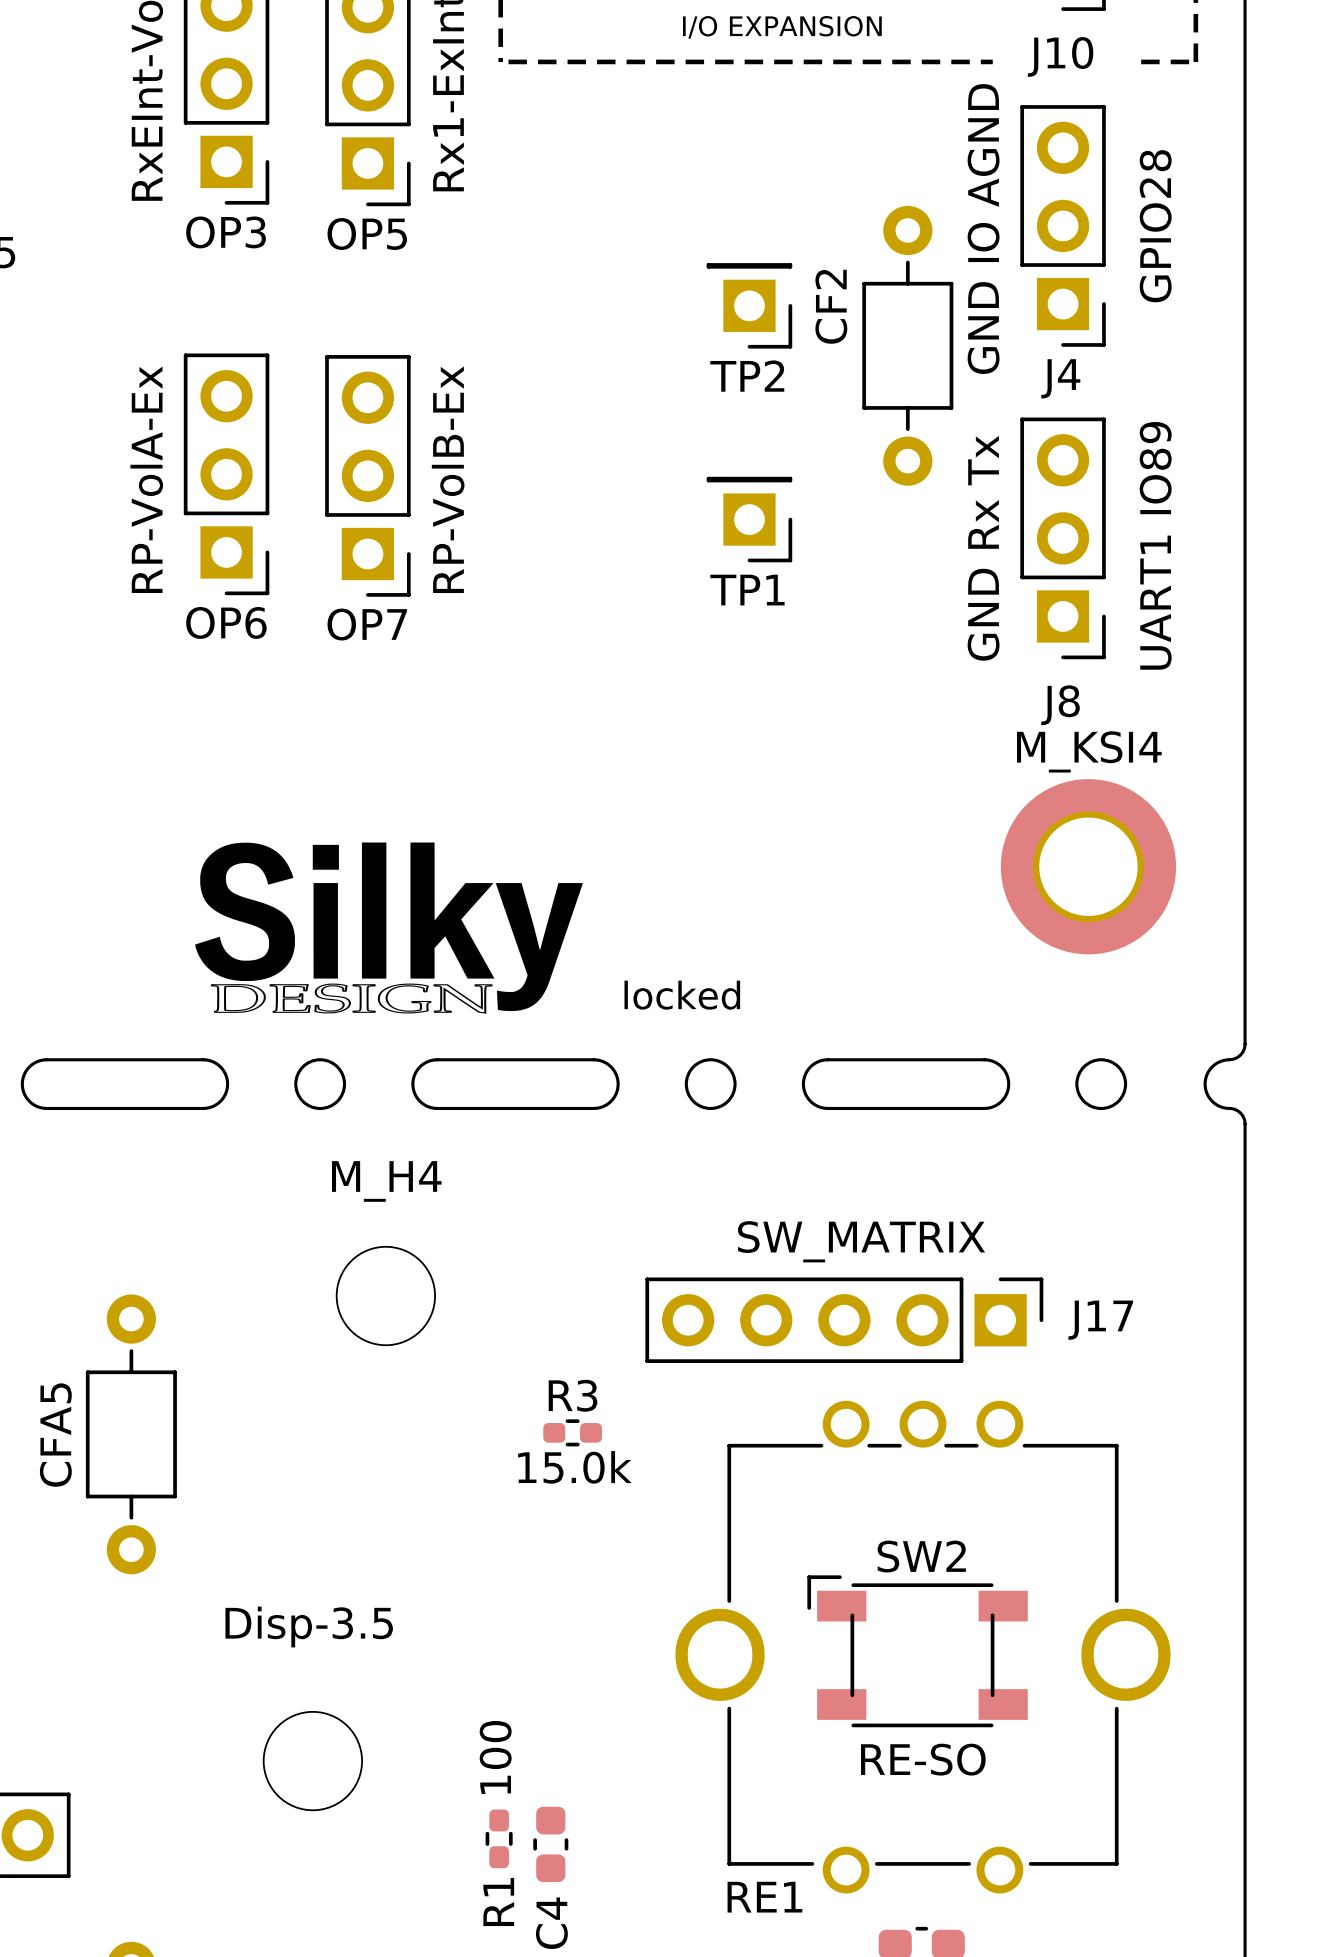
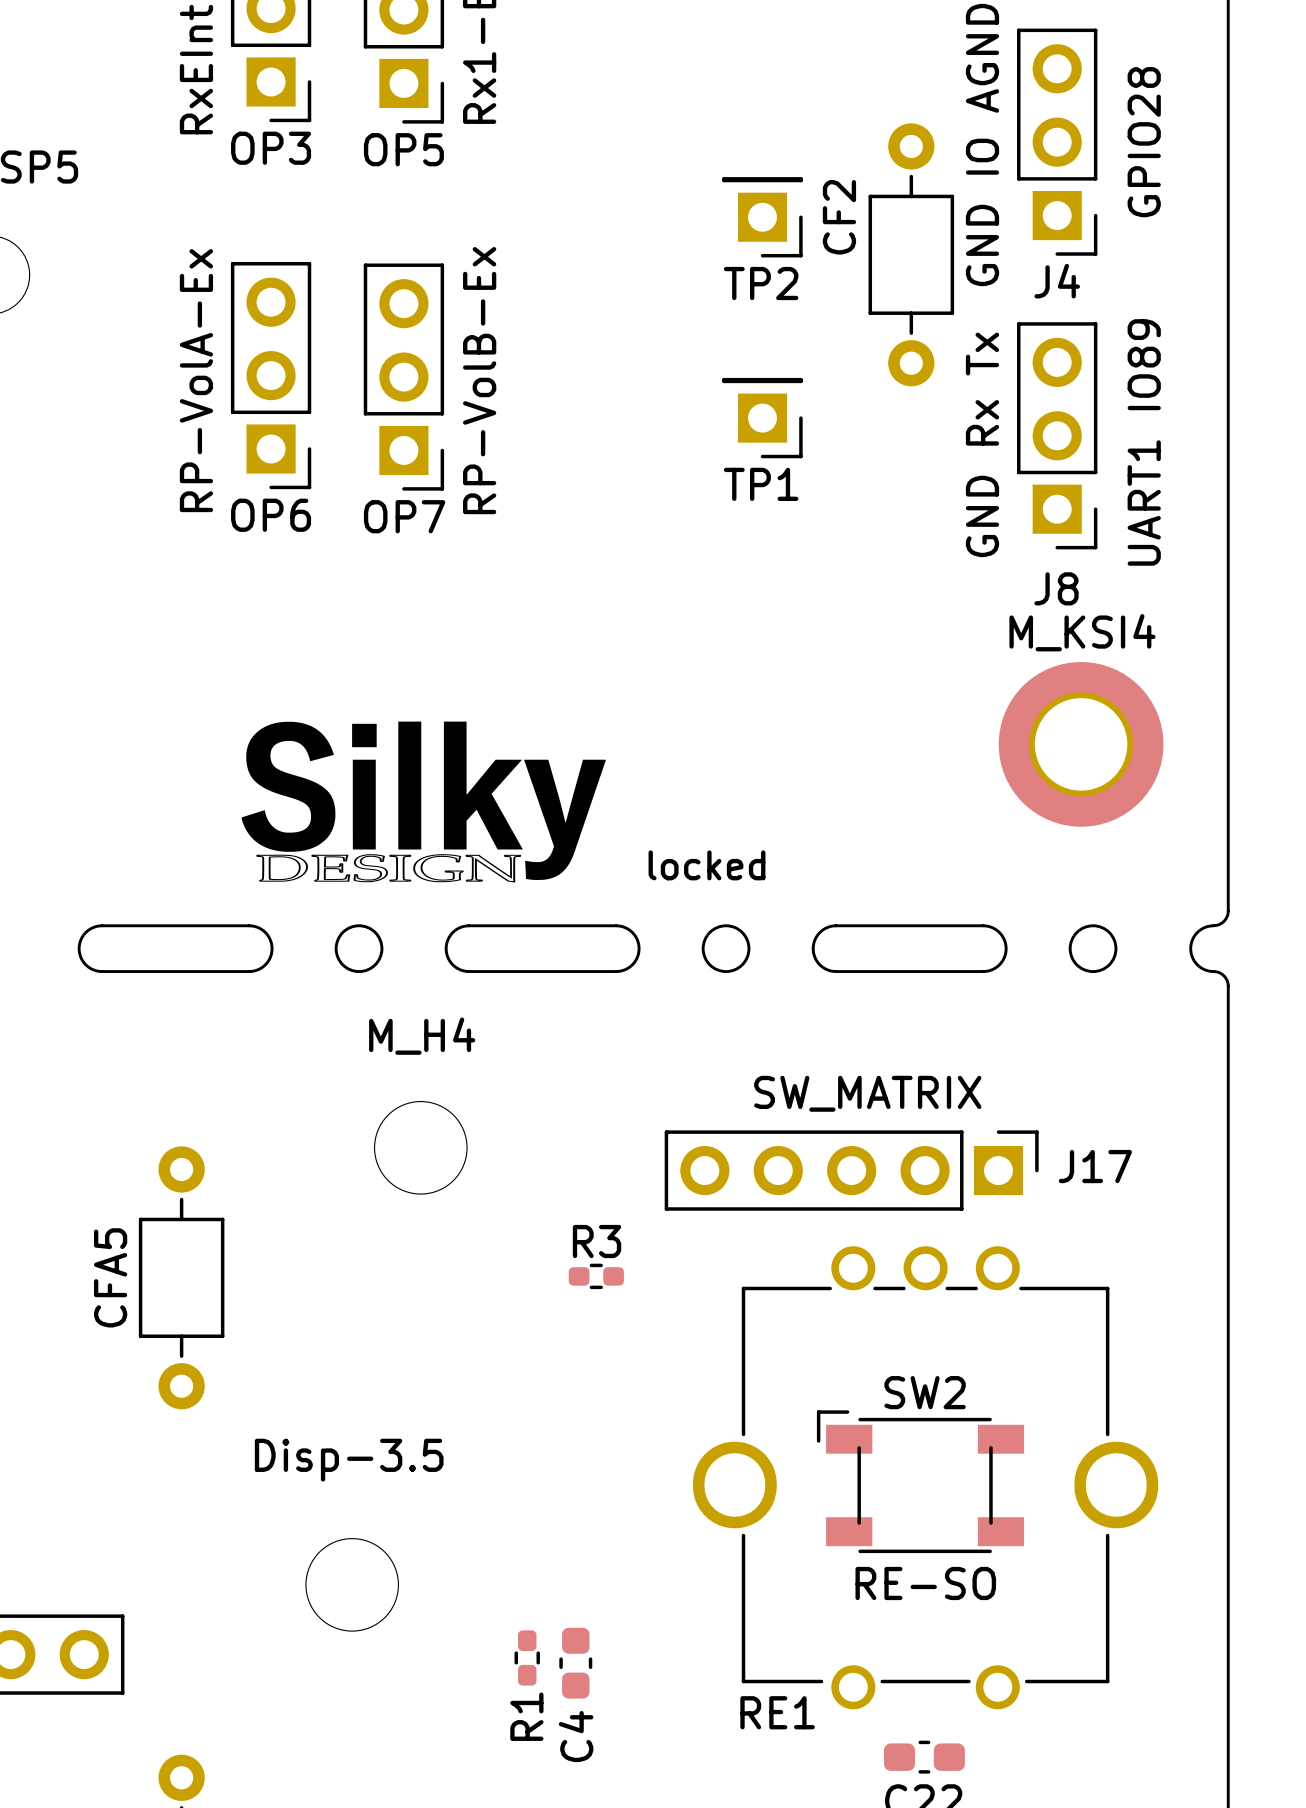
R3 value: 15.0k (574, 1467) -> none
R1 value: 100 (495, 1757) -> none

